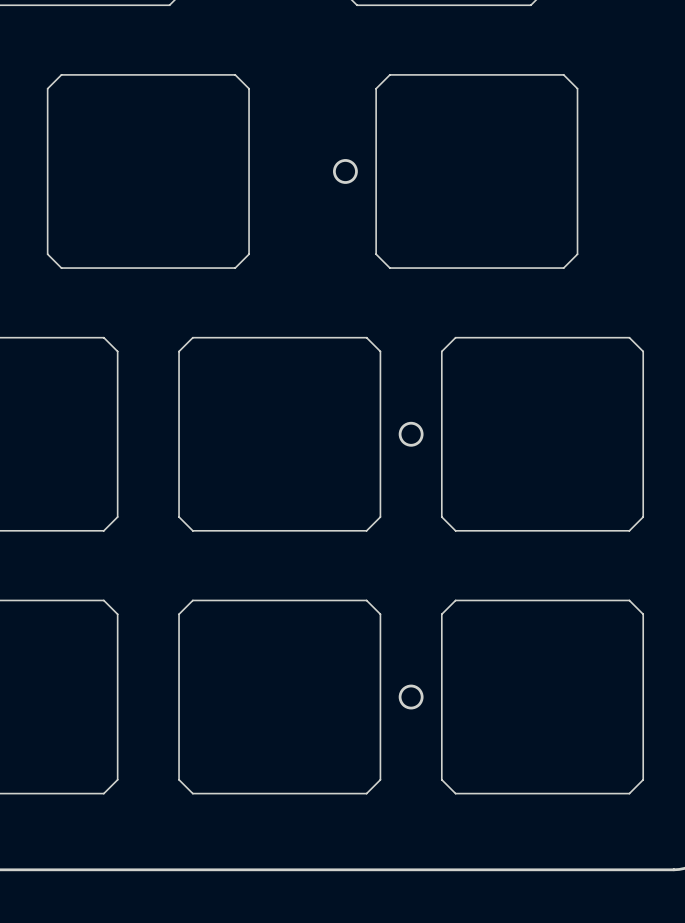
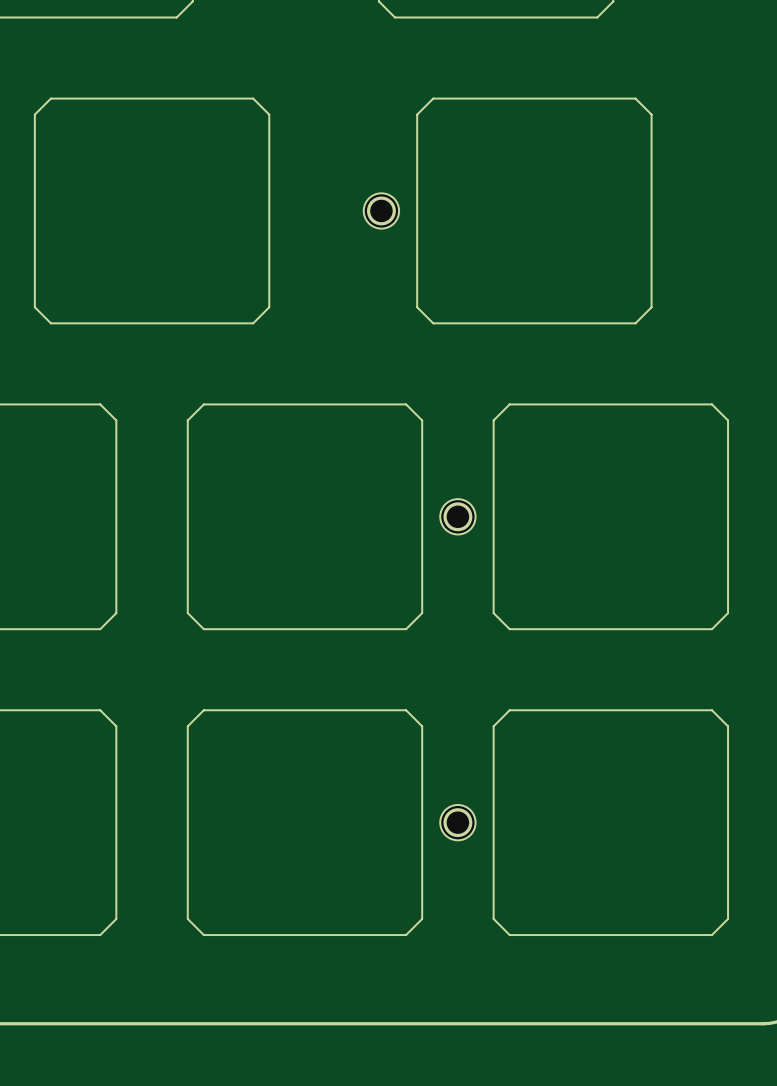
part: none -> (381, 210)
part: none -> (457, 516)
part: none -> (457, 822)

